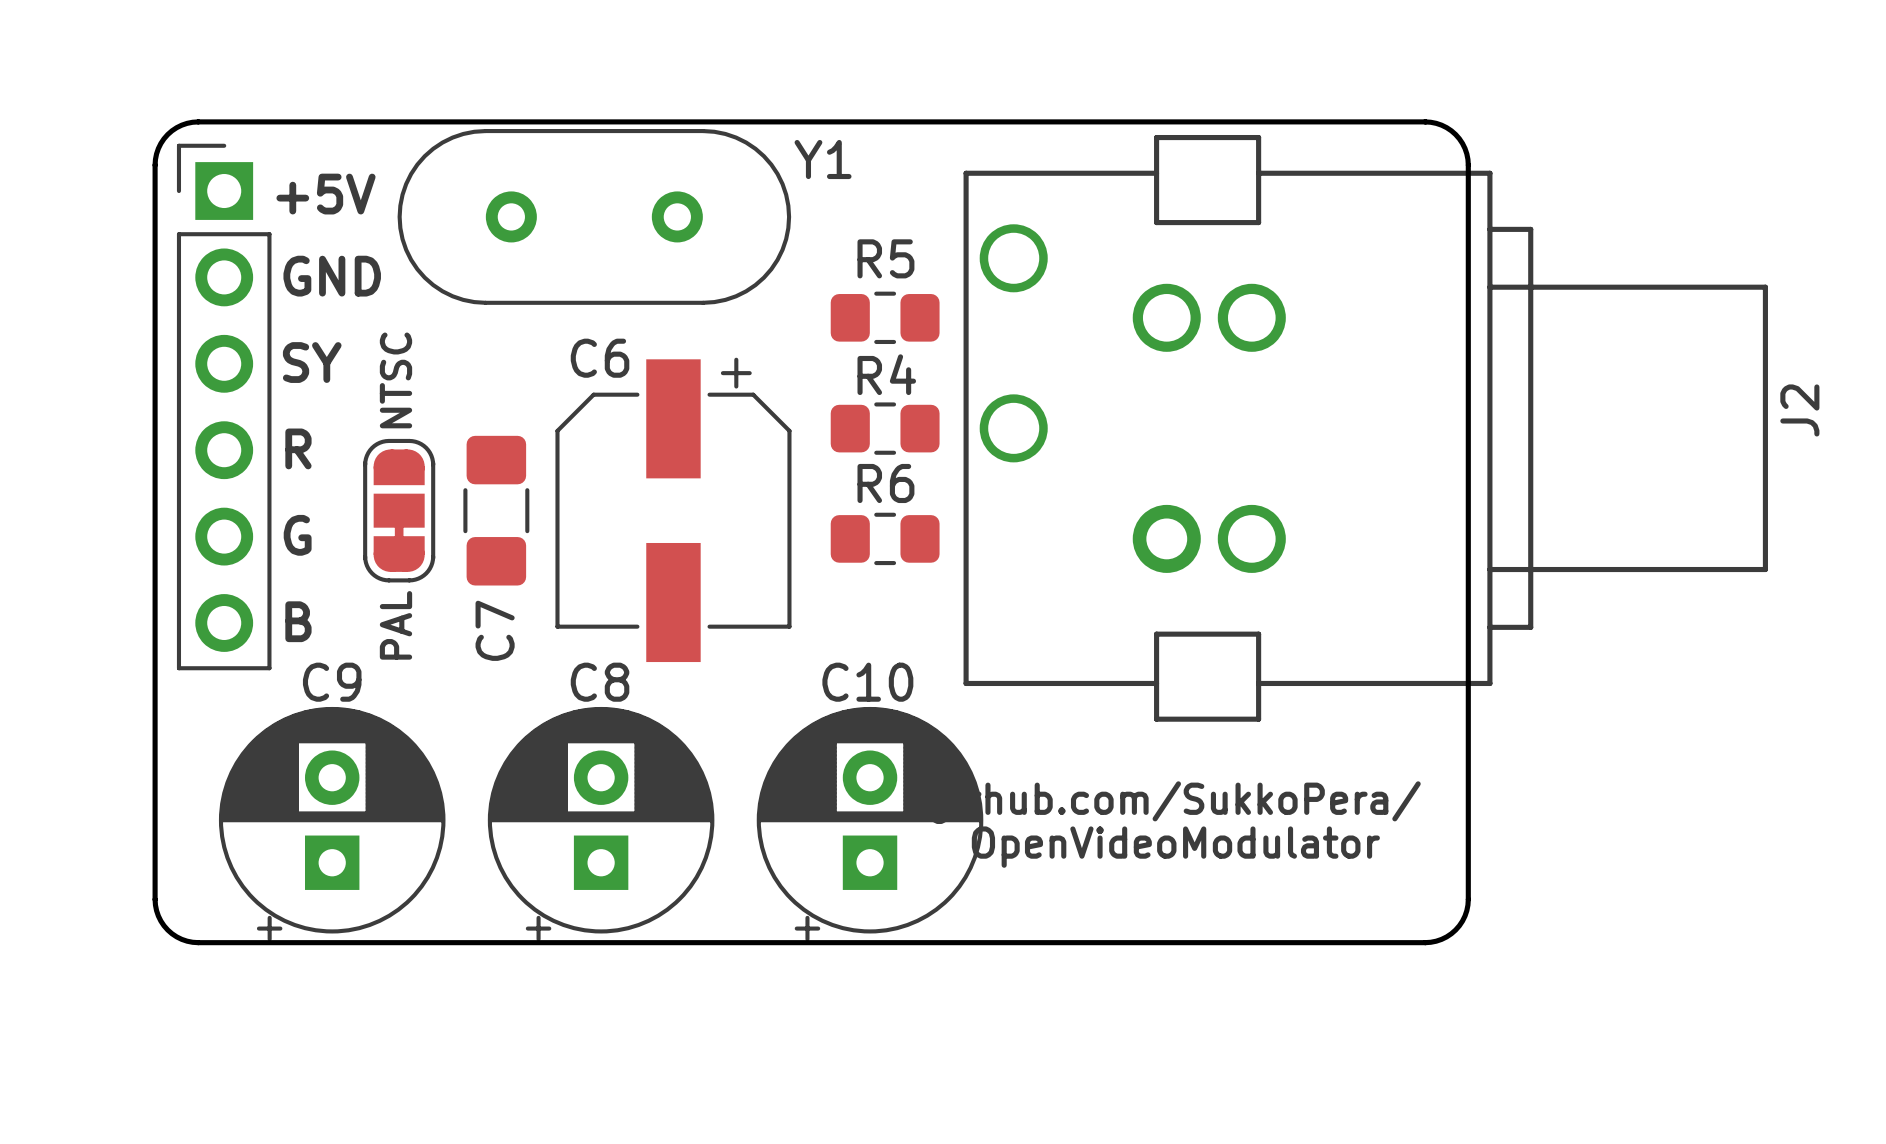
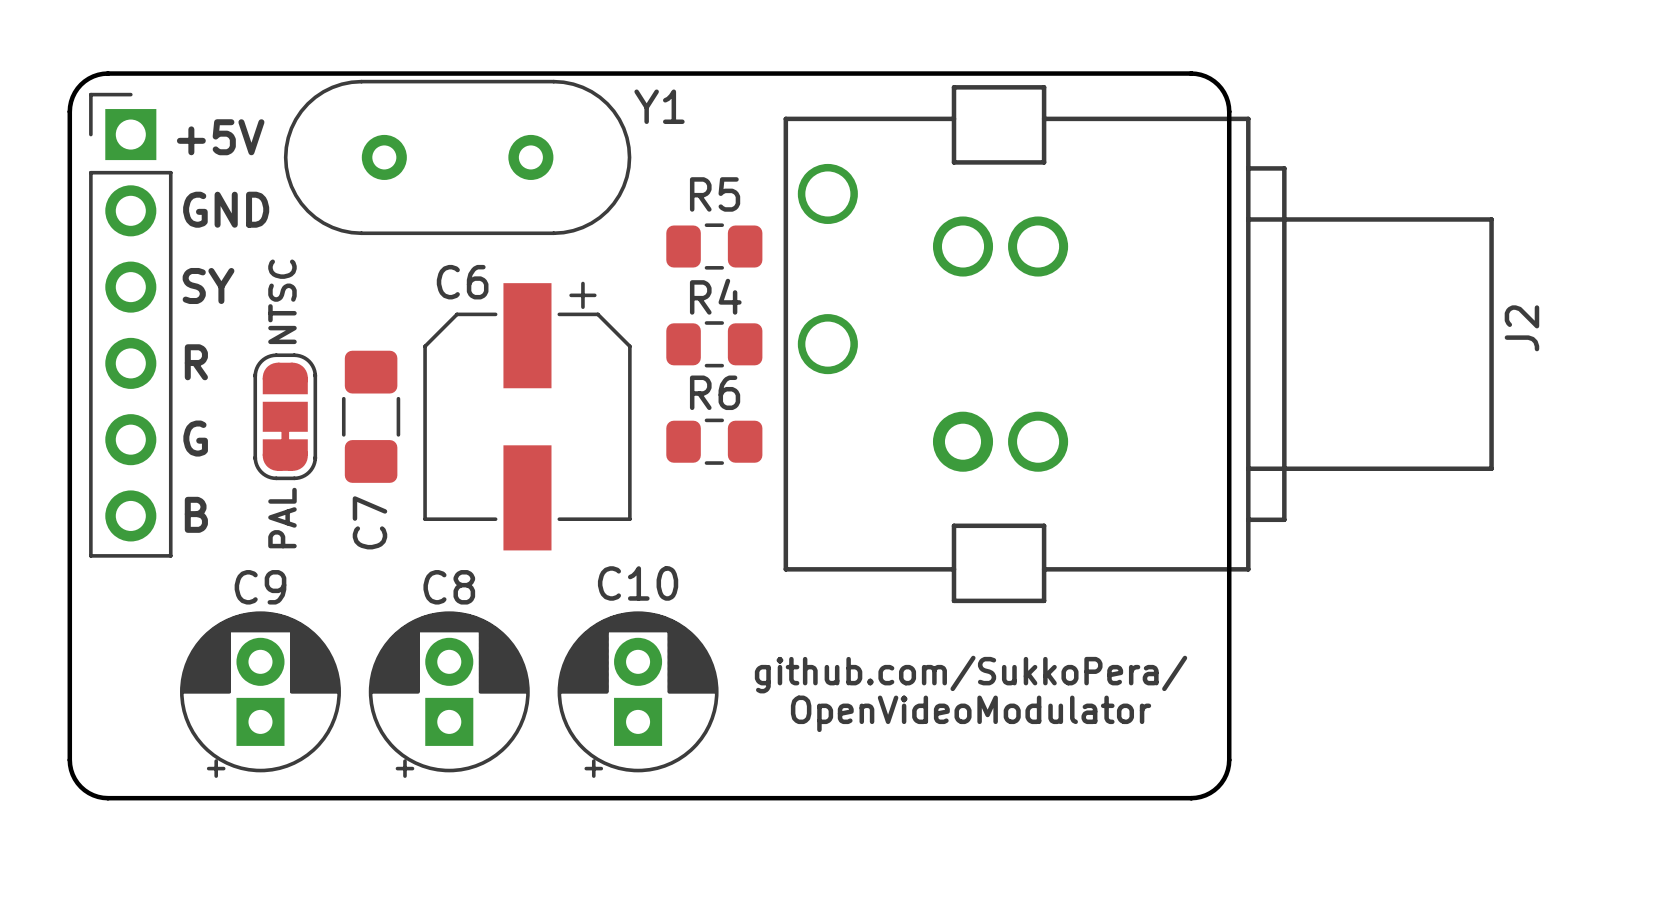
C9 footprint: [218, 706, 446, 942] -> [180, 611, 341, 778]
C8 footprint: [487, 706, 715, 942] -> [368, 611, 530, 778]
C10 footprint: [756, 706, 984, 942] -> [557, 611, 719, 778]

